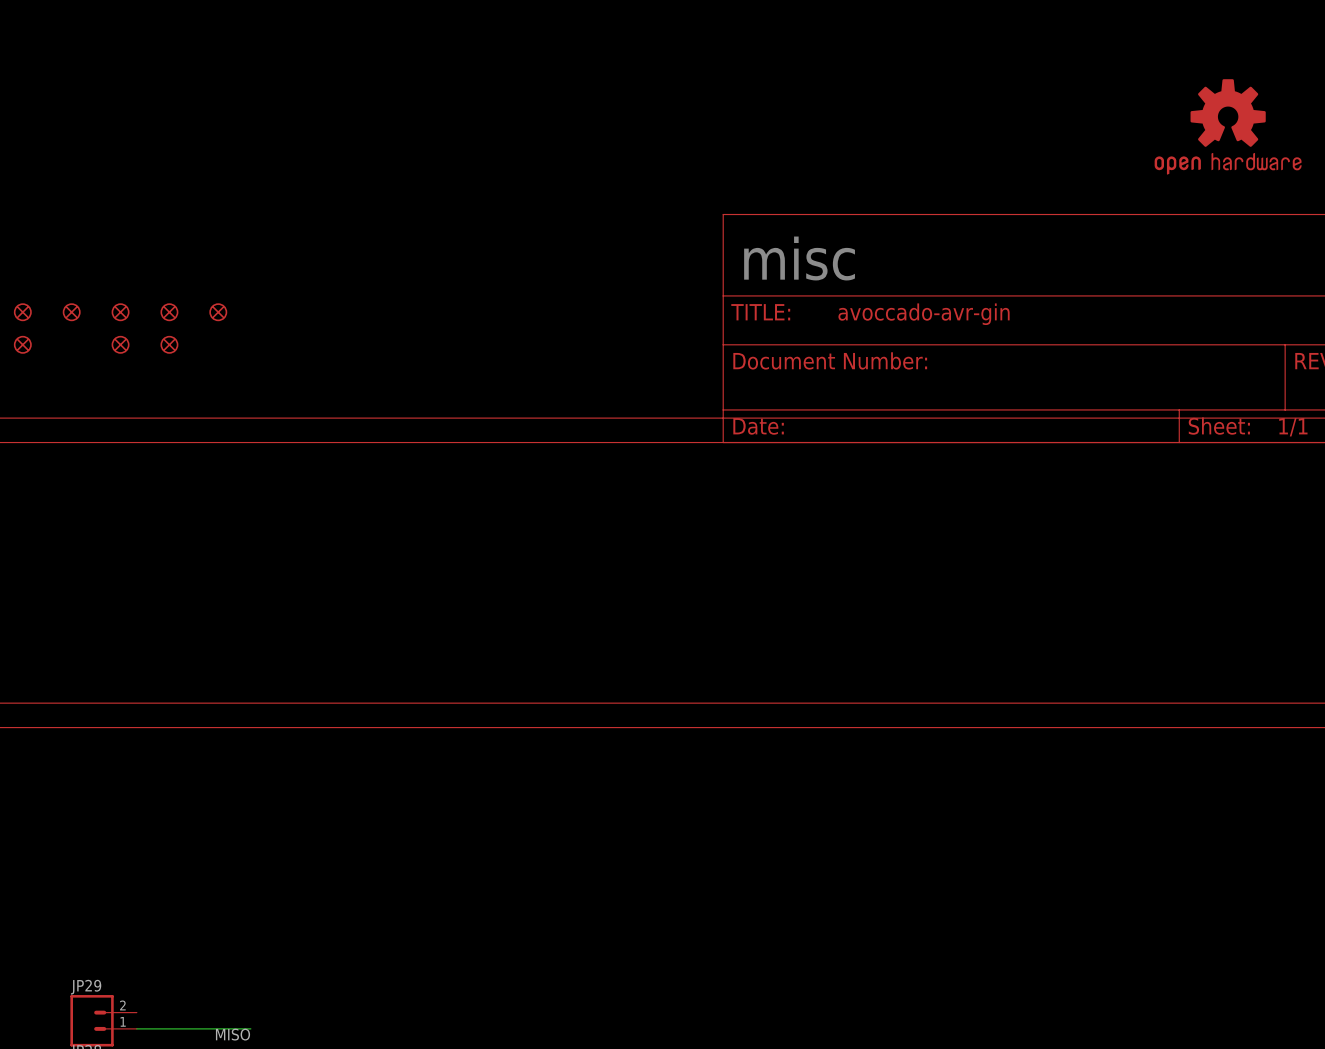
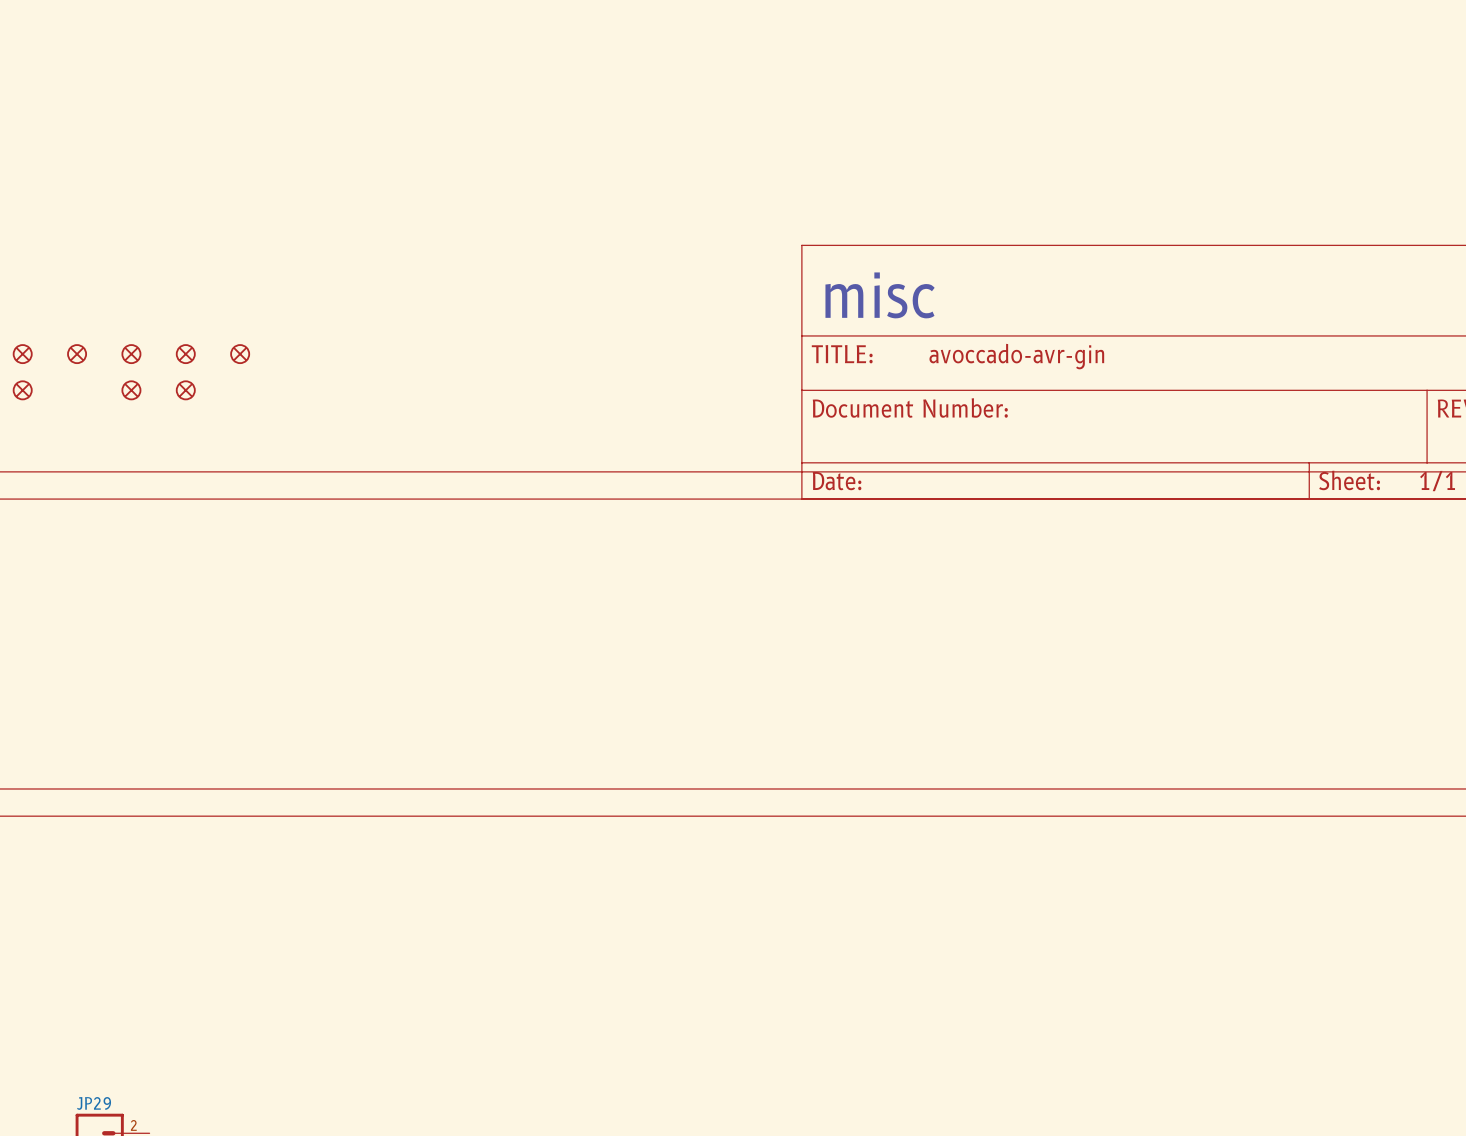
part: (1228, 126) -> none

